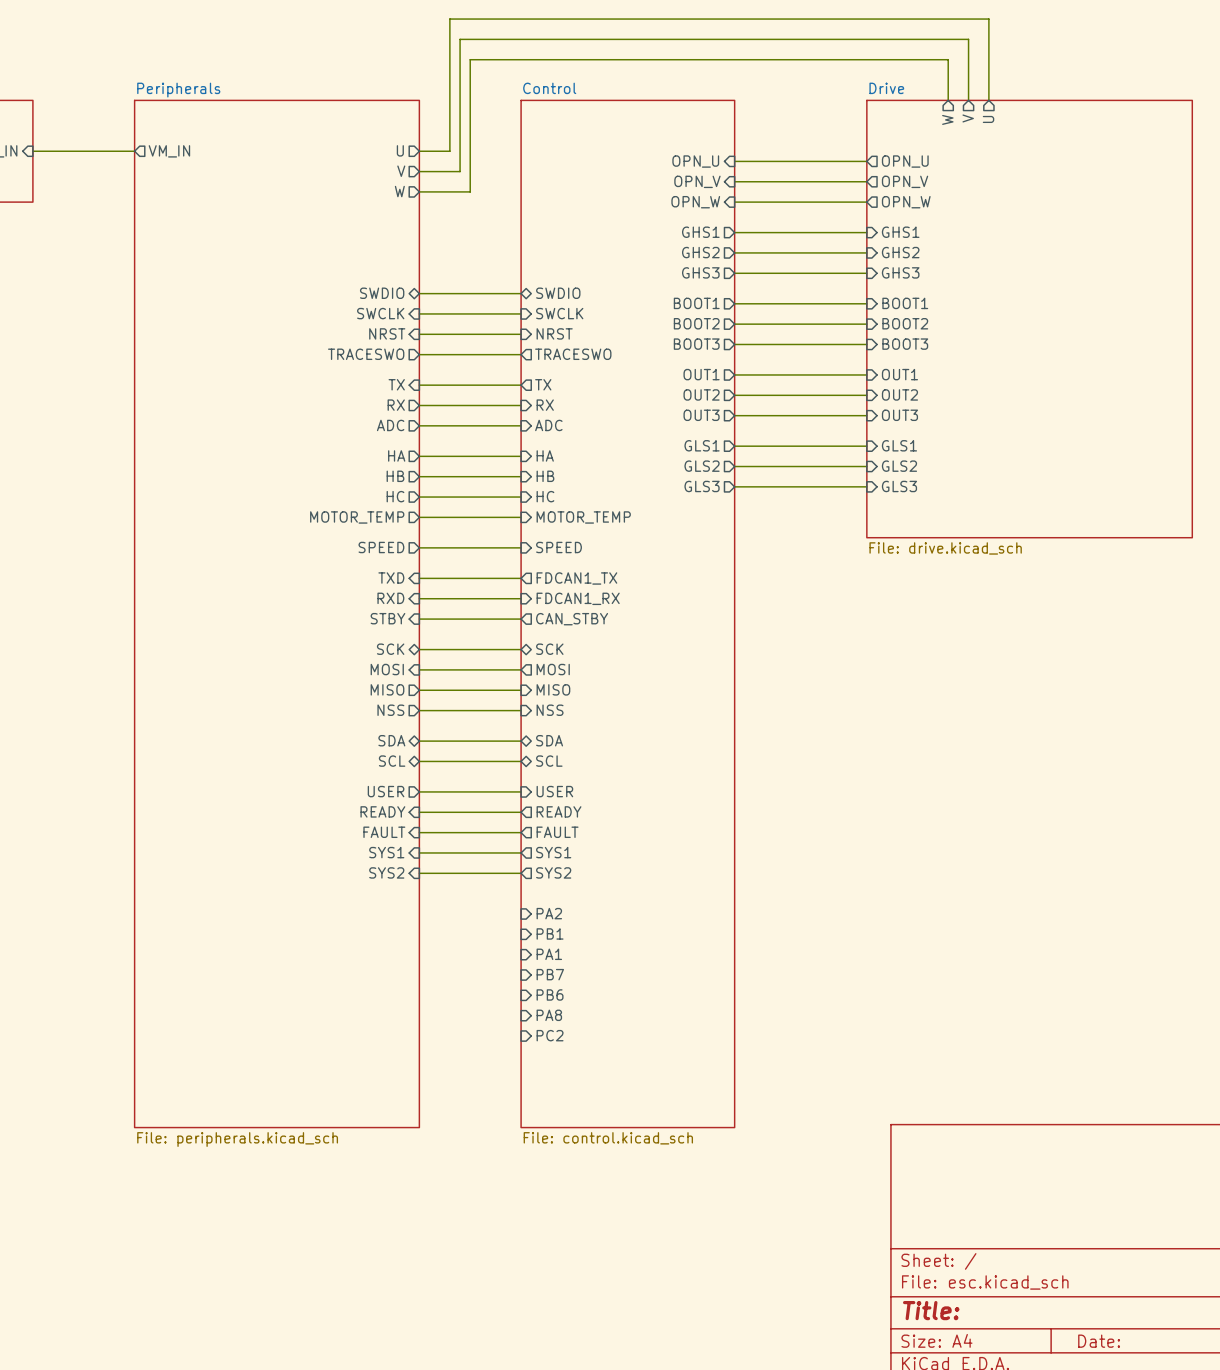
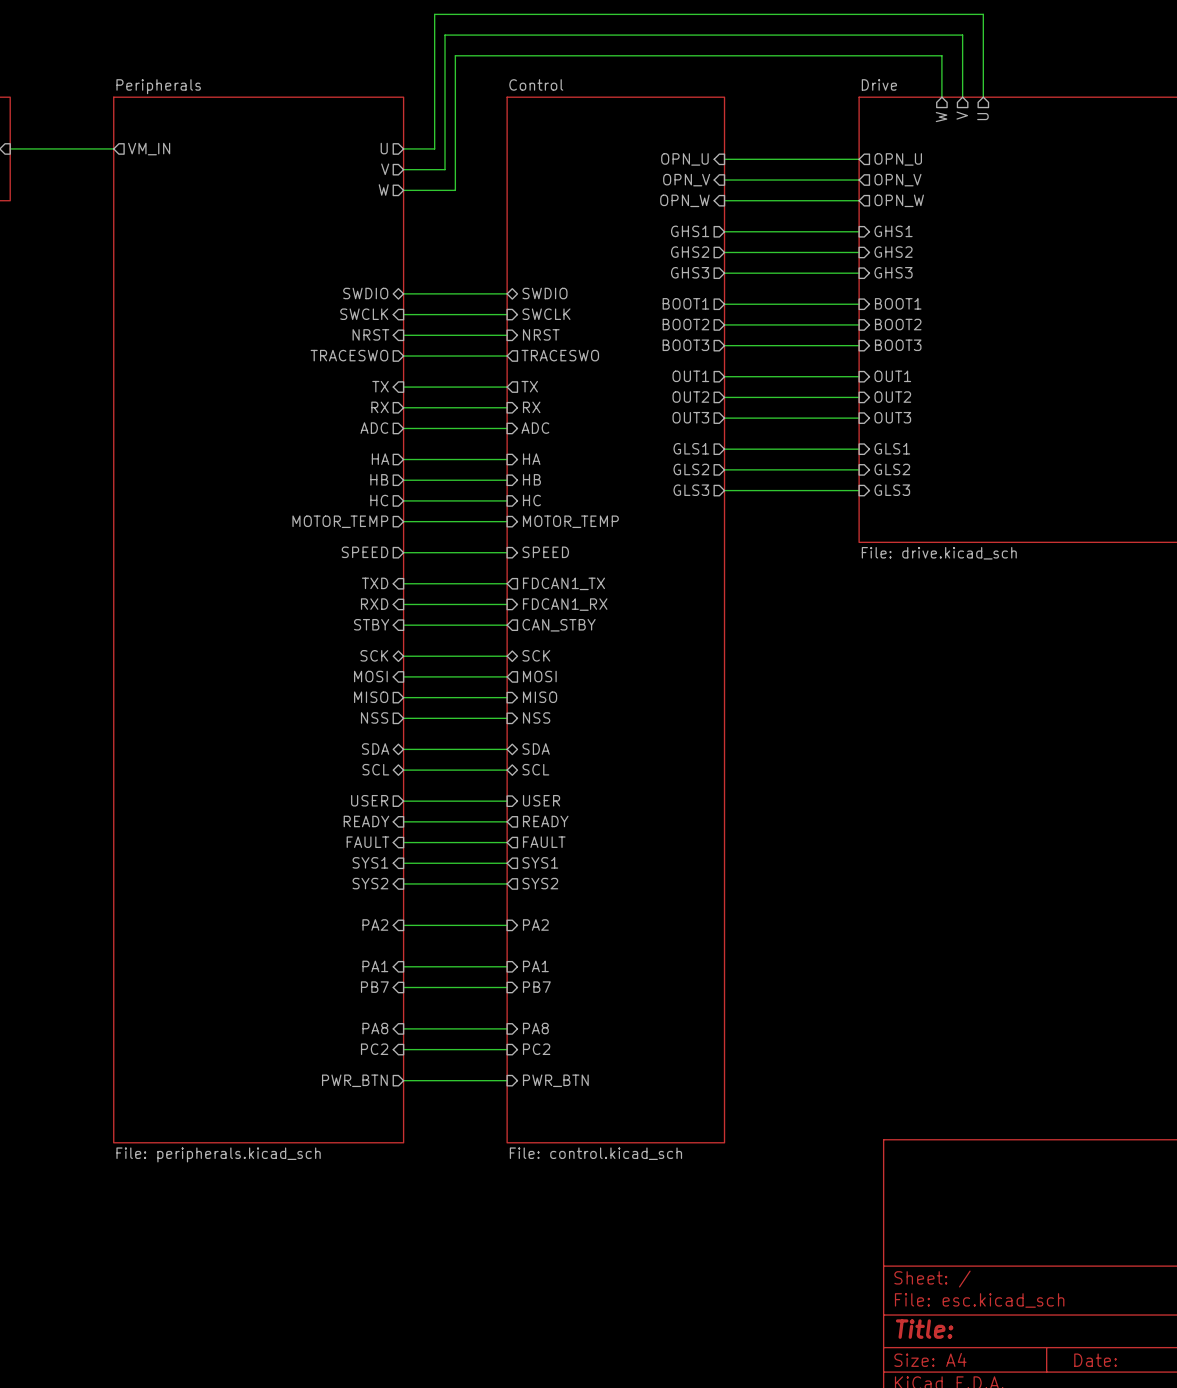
sheet pin: none -> PA2 (375, 924)
wire: none -> (403, 925) (507, 925)
sheet pin: PB1 (550, 933) -> none
sheet pin: none -> PA1 (375, 966)
wire: none -> (403, 966) (507, 966)
sheet pin: none -> PB7 (374, 987)
wire: none -> (403, 987) (507, 987)
sheet pin: PB6 (550, 994) -> none
sheet pin: none -> PA8 (375, 1028)
wire: none -> (403, 1028) (507, 1028)
sheet pin: none -> PC2 (374, 1049)
wire: none -> (403, 1049) (507, 1049)
sheet pin: none -> PWR_BTN (354, 1080)
wire: none -> (403, 1080) (507, 1080)
sheet pin: none -> PWR_BTN (555, 1080)

